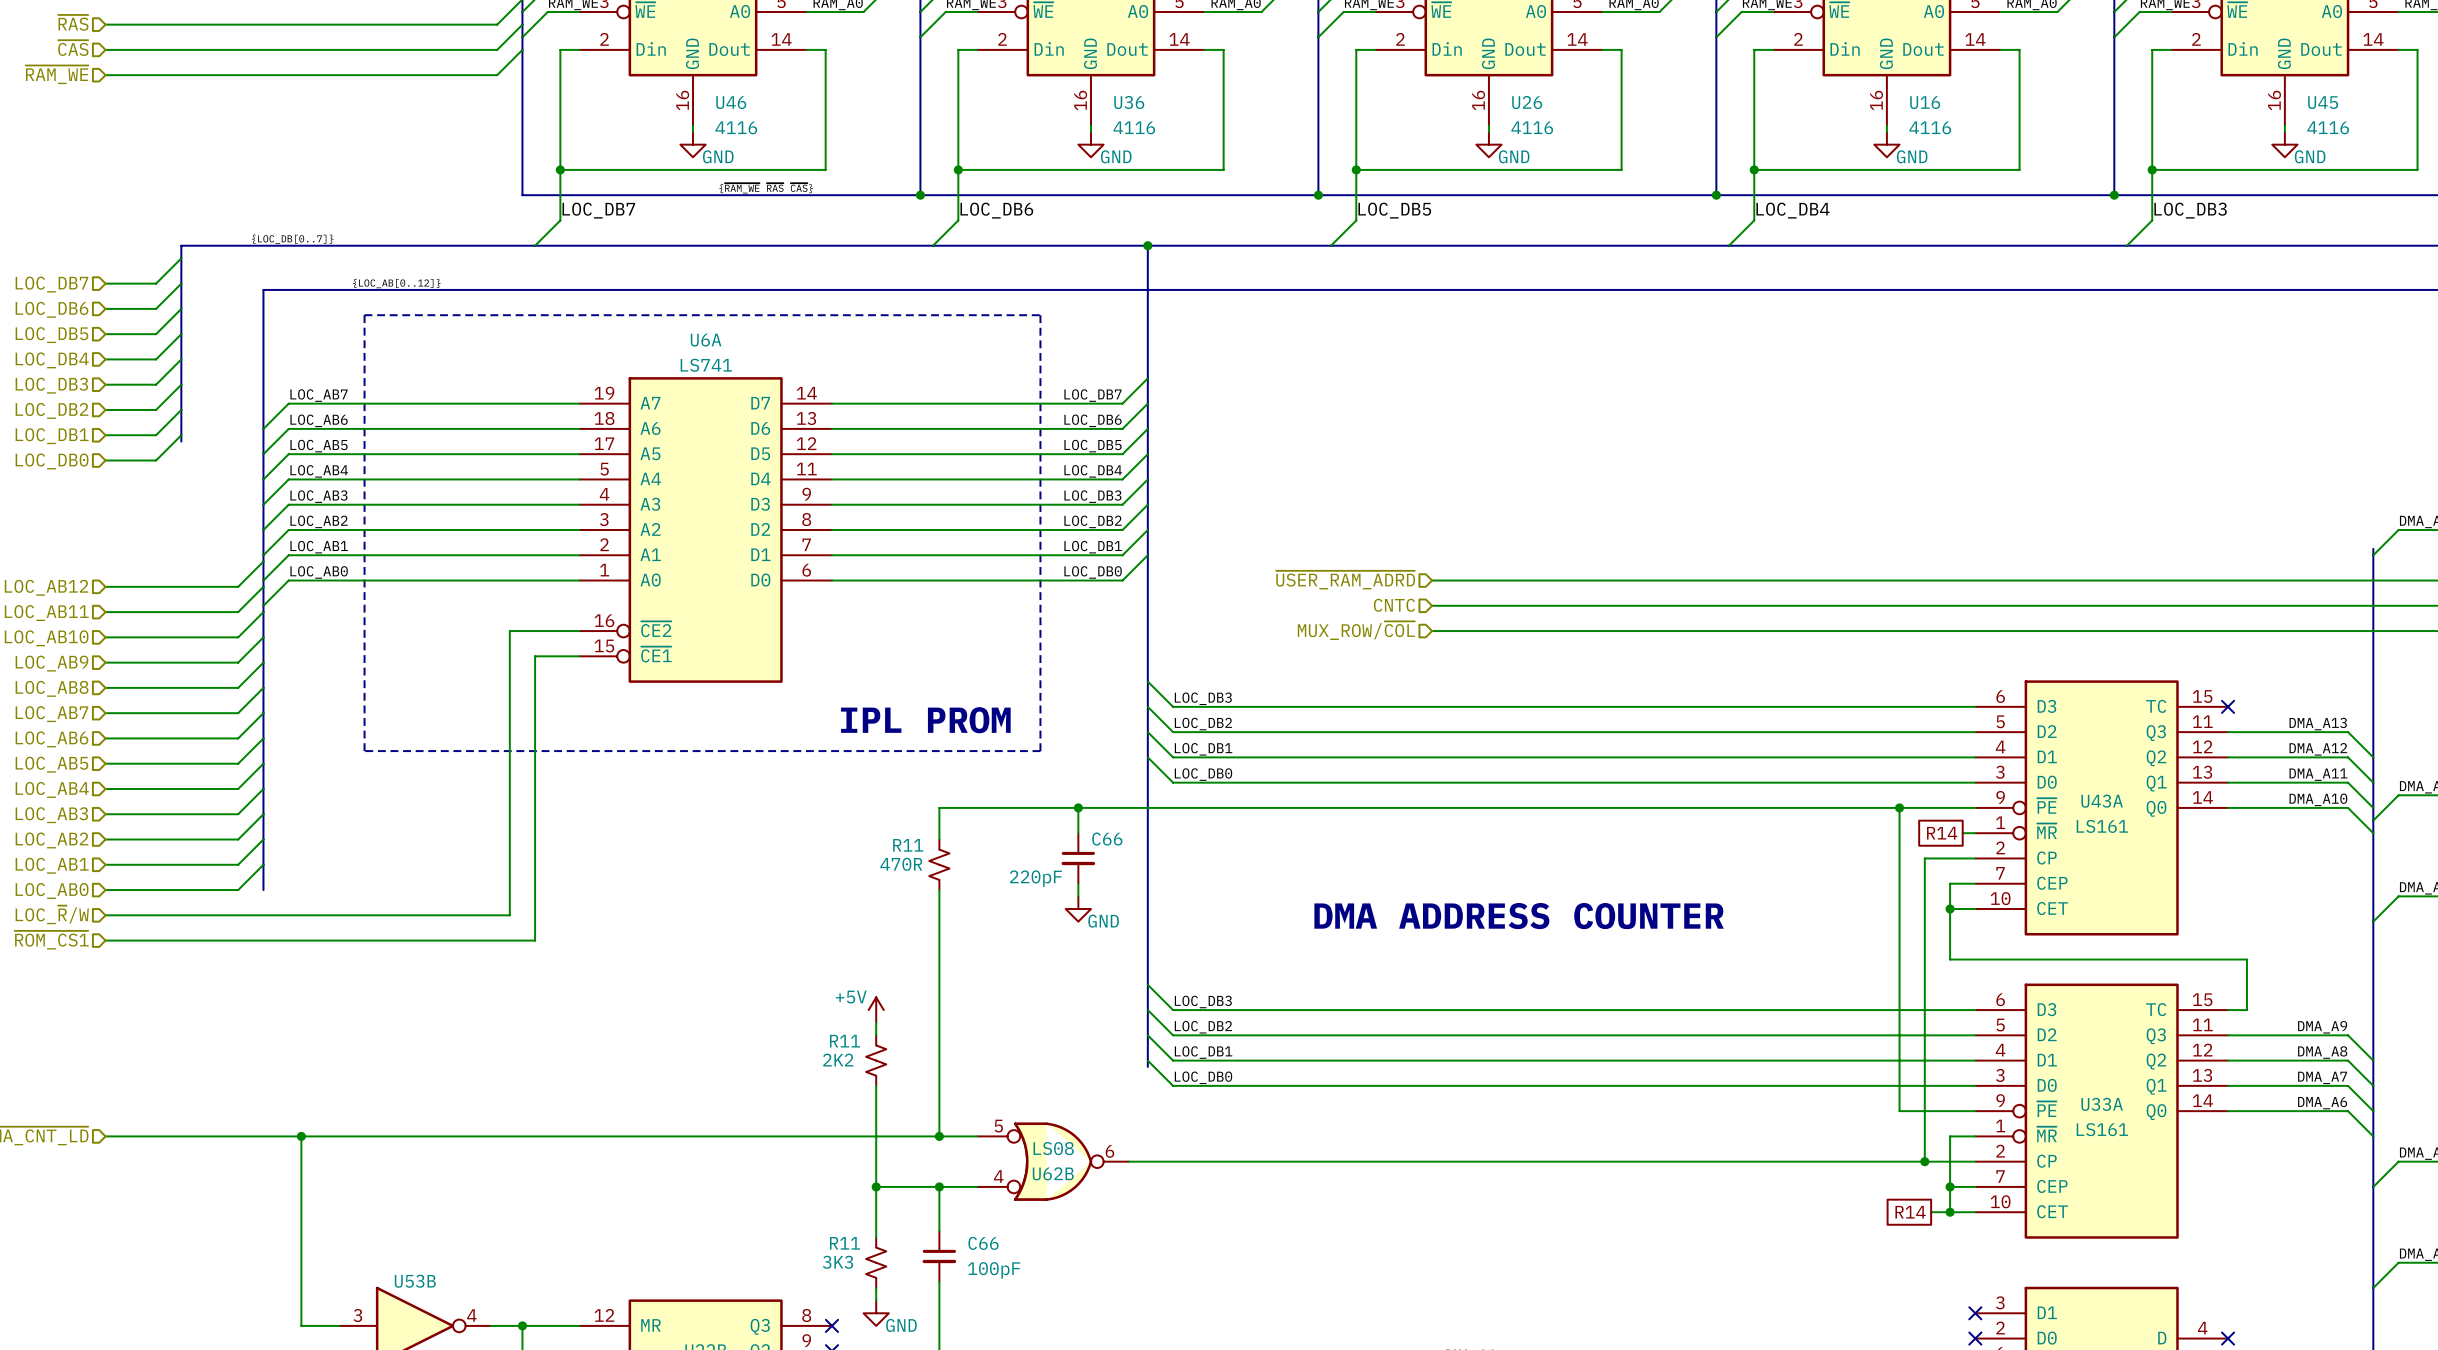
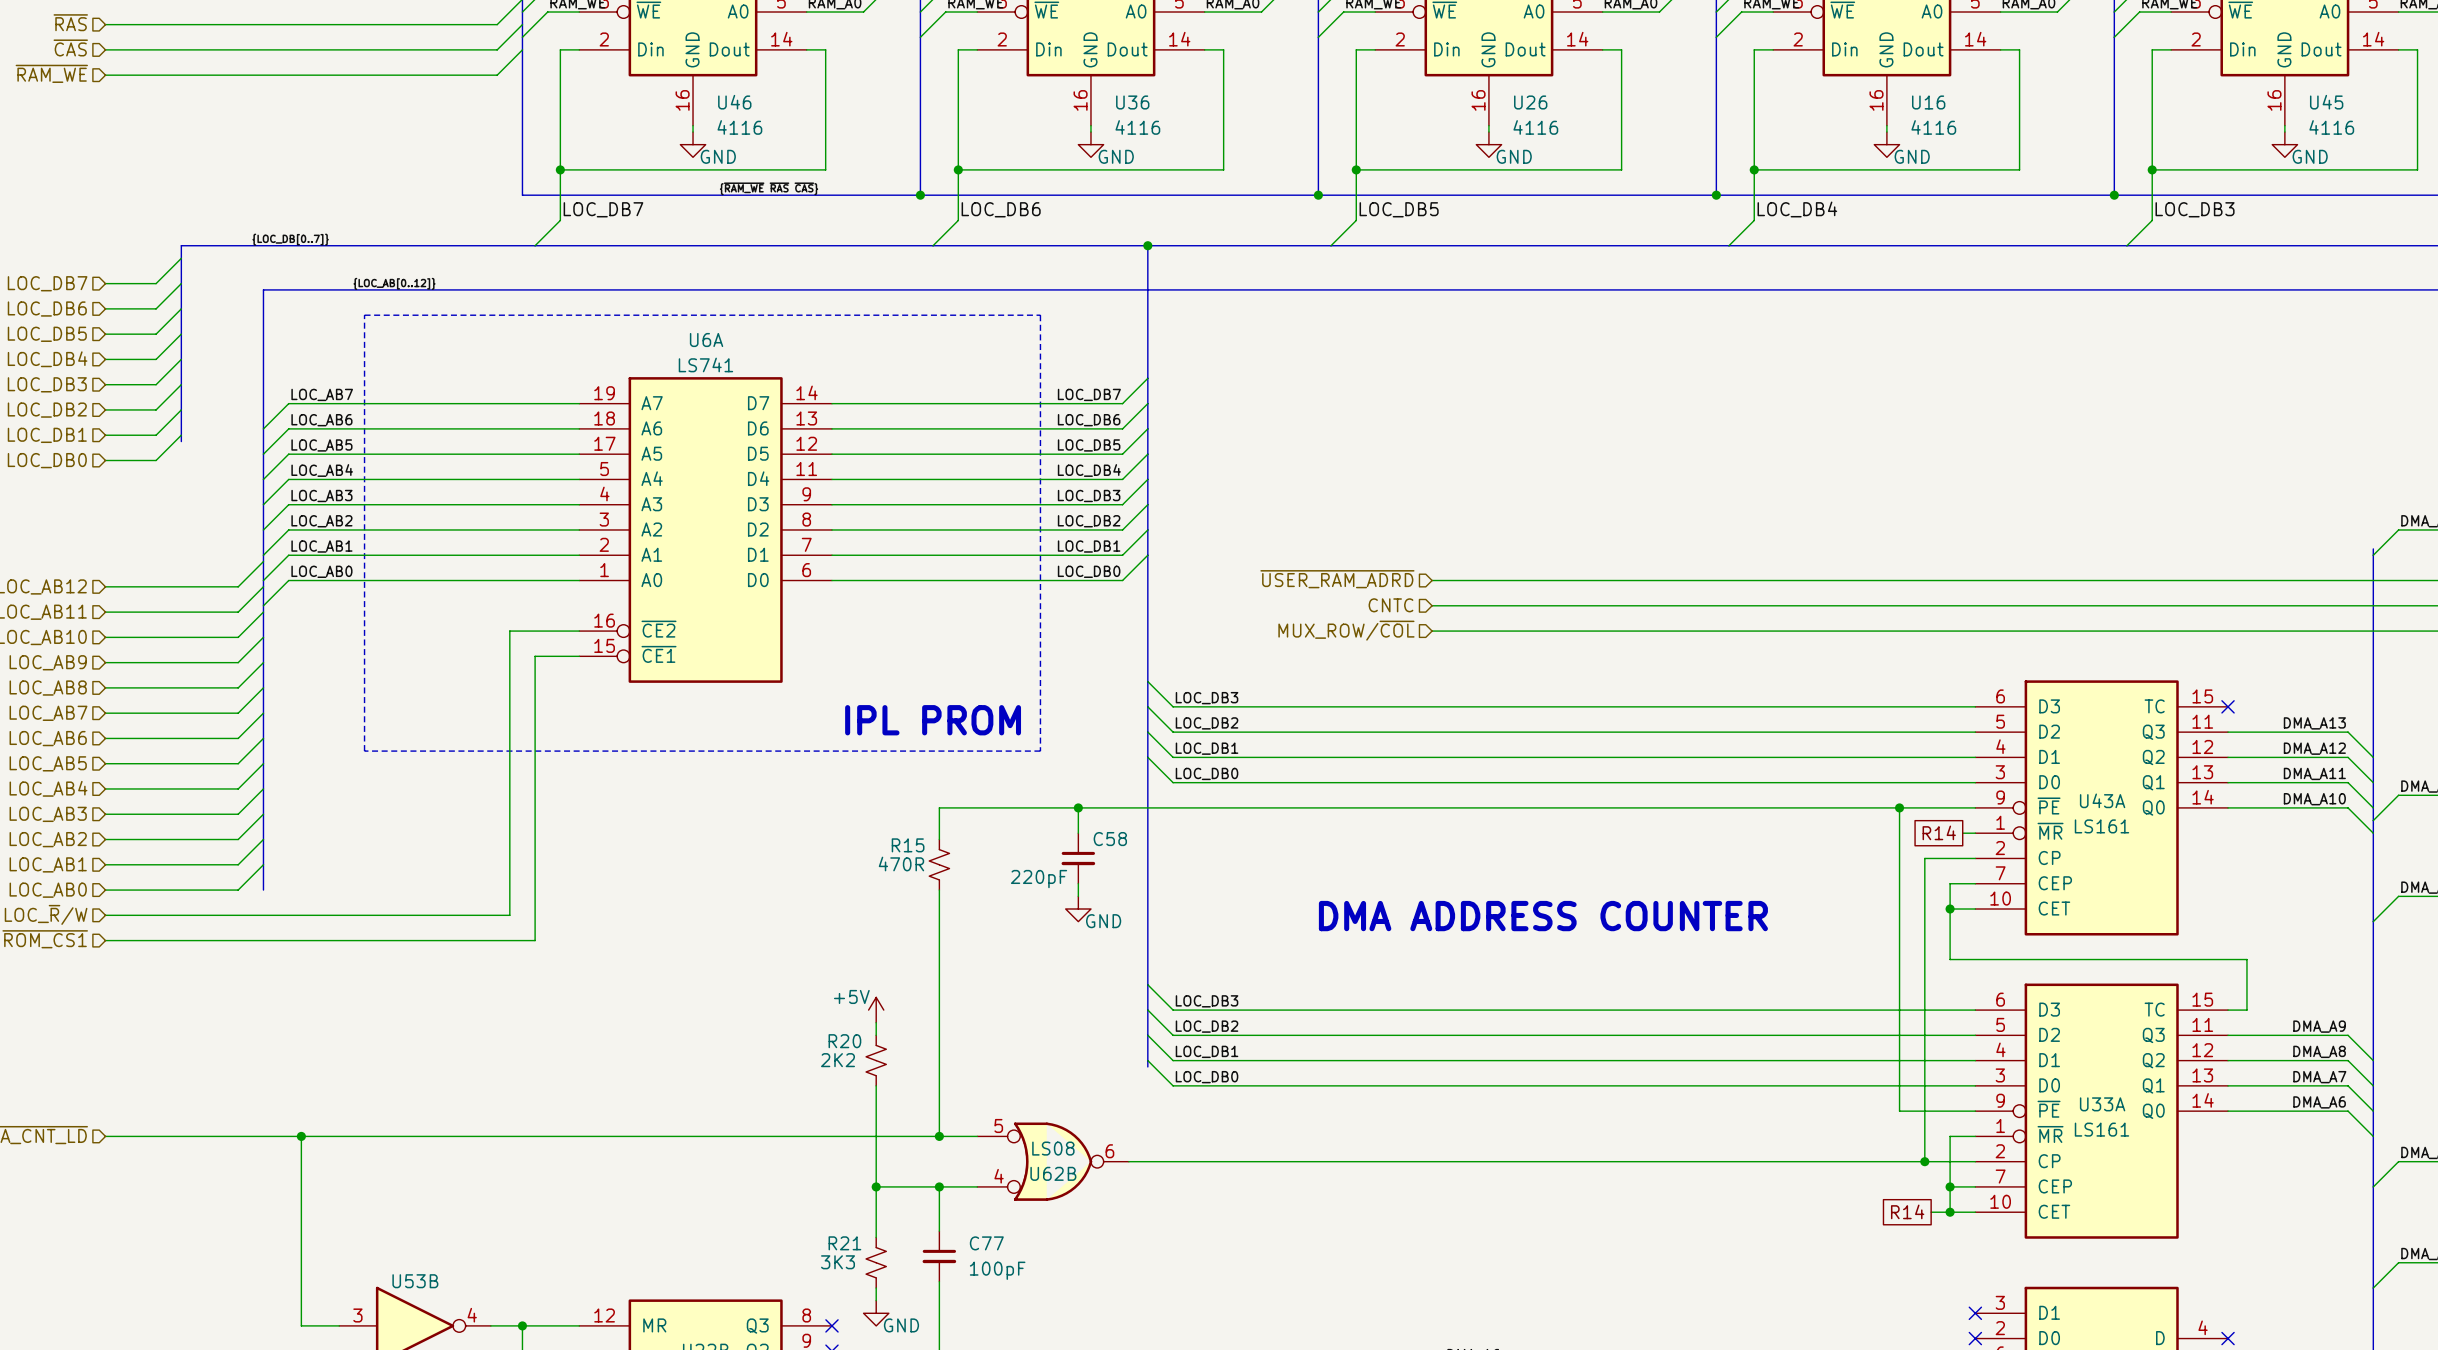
C66 name: C66 (1107, 839) -> C58 (1110, 839)
R11 name: R11 (908, 845) -> R15 (908, 845)
R11 name: R11 (845, 1041) -> R20 (844, 1041)
R11 name: R11 (845, 1243) -> R21 (844, 1243)
C66 name: C66 (983, 1243) -> C77 (986, 1243)

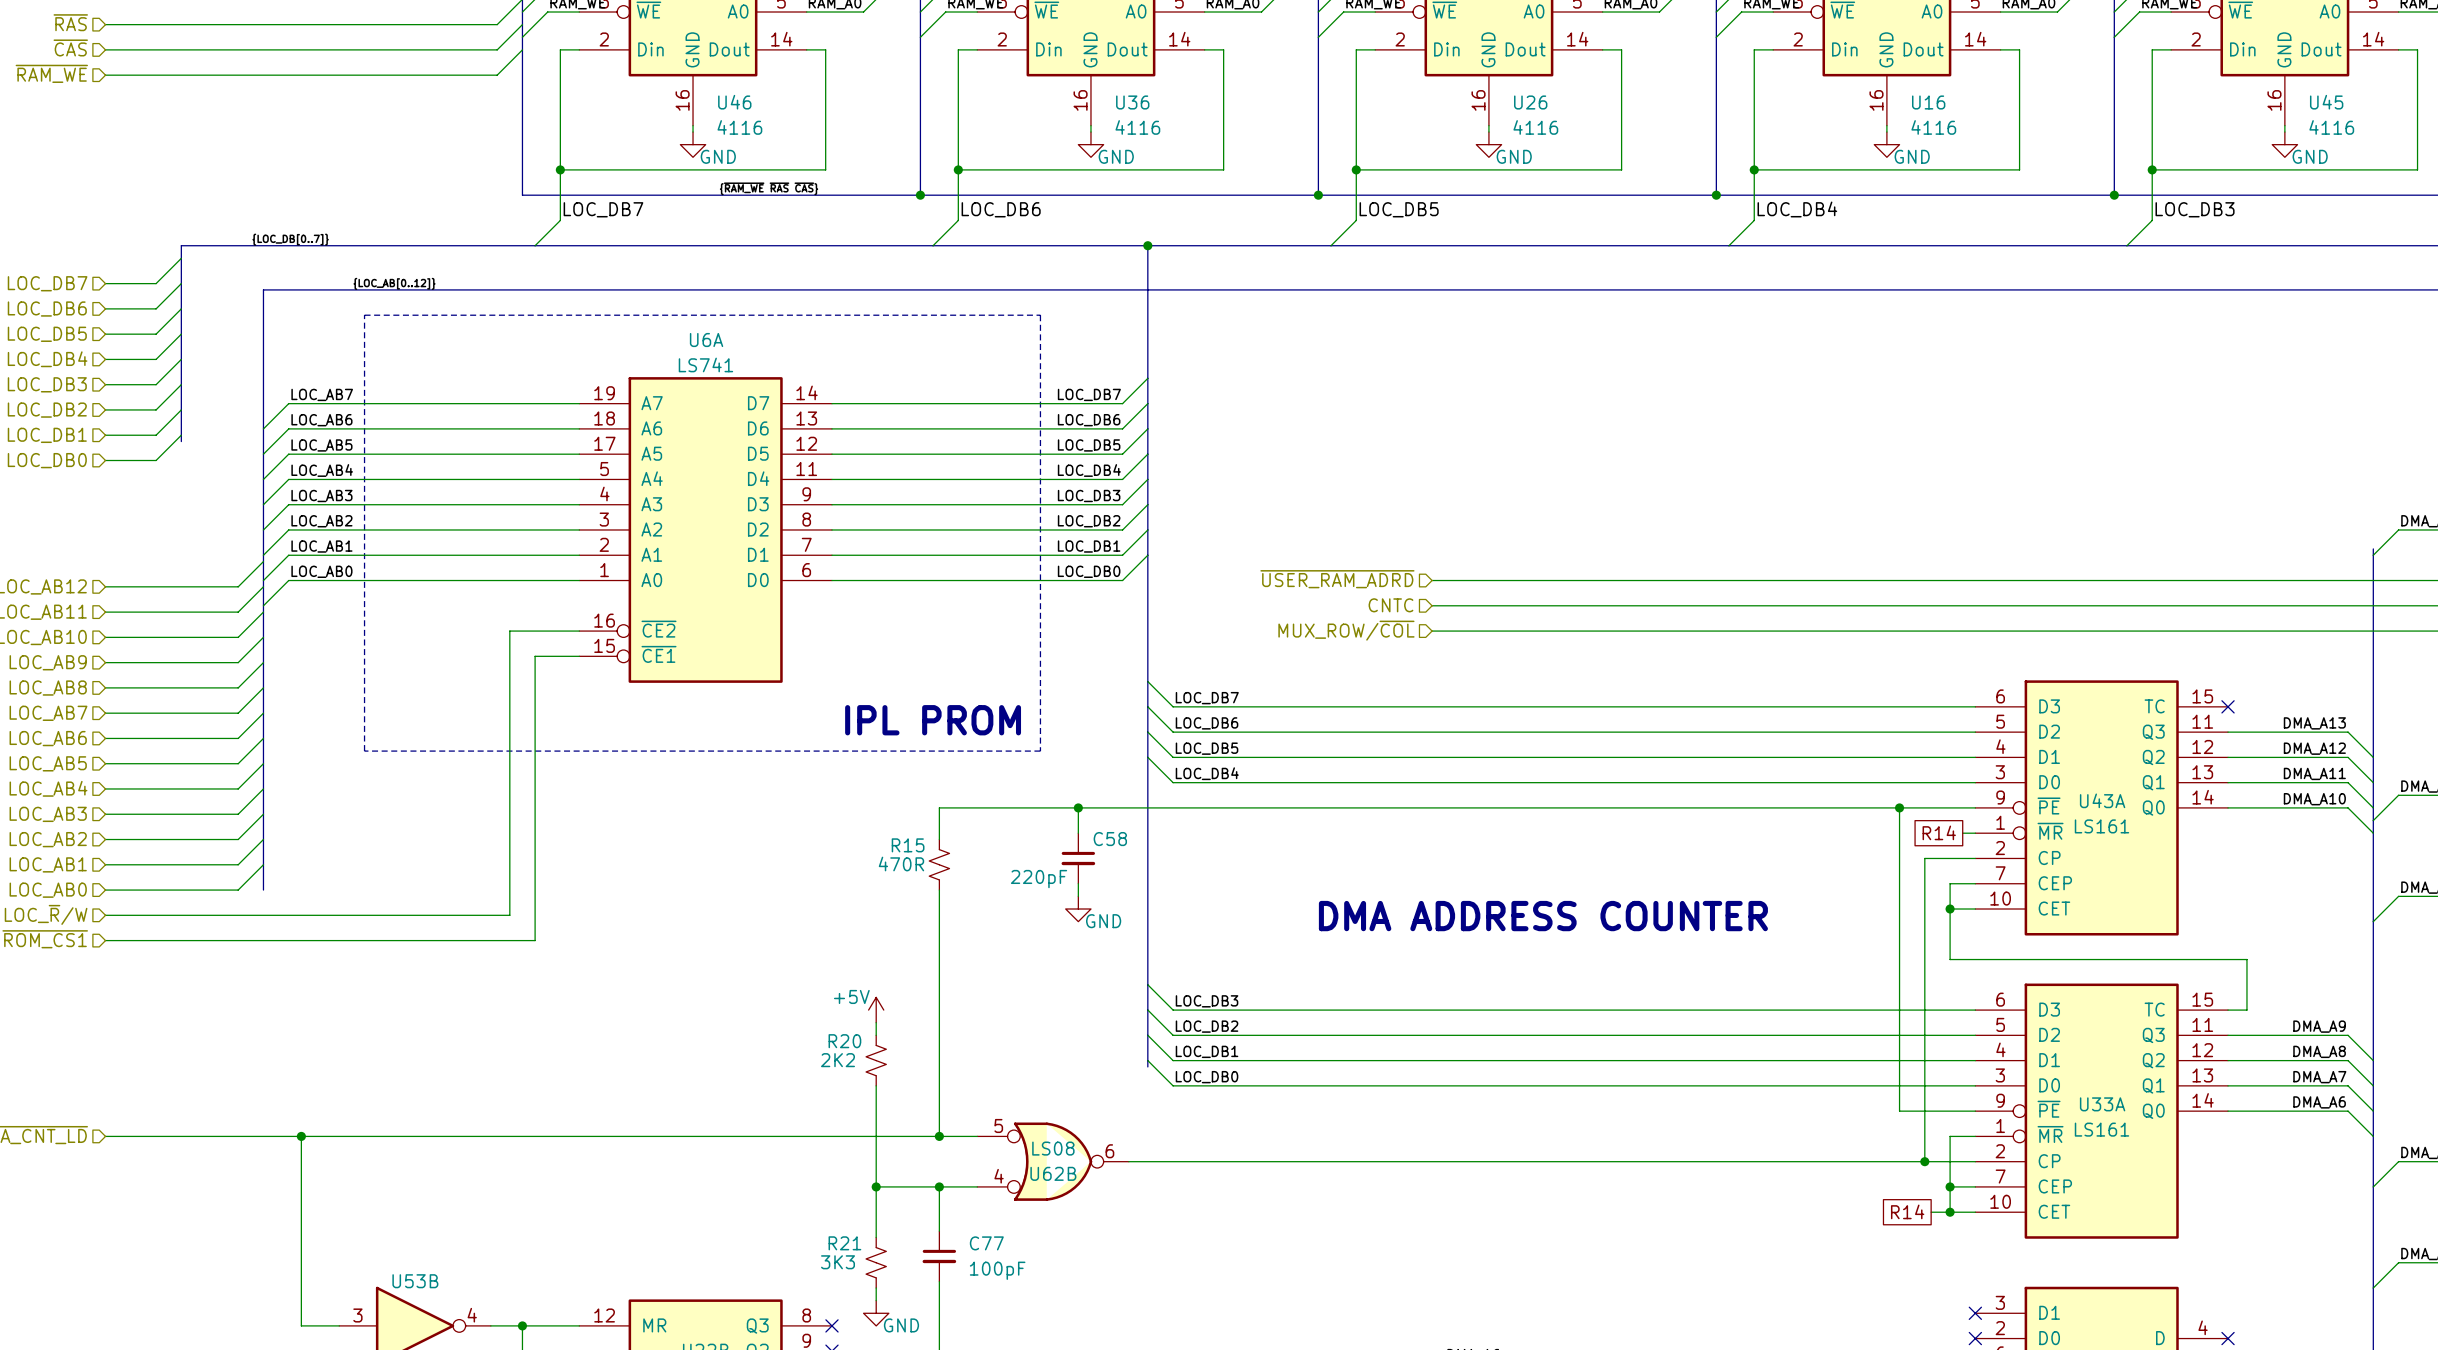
label: LOC_DB3 (1207, 698) -> LOC_DB7 (1207, 698)
label: LOC_DB2 (1207, 723) -> LOC_DB6 (1207, 723)
label: LOC_DB1 (1207, 748) -> LOC_DB5 (1207, 748)
label: LOC_DB0 (1207, 773) -> LOC_DB4 (1207, 773)

